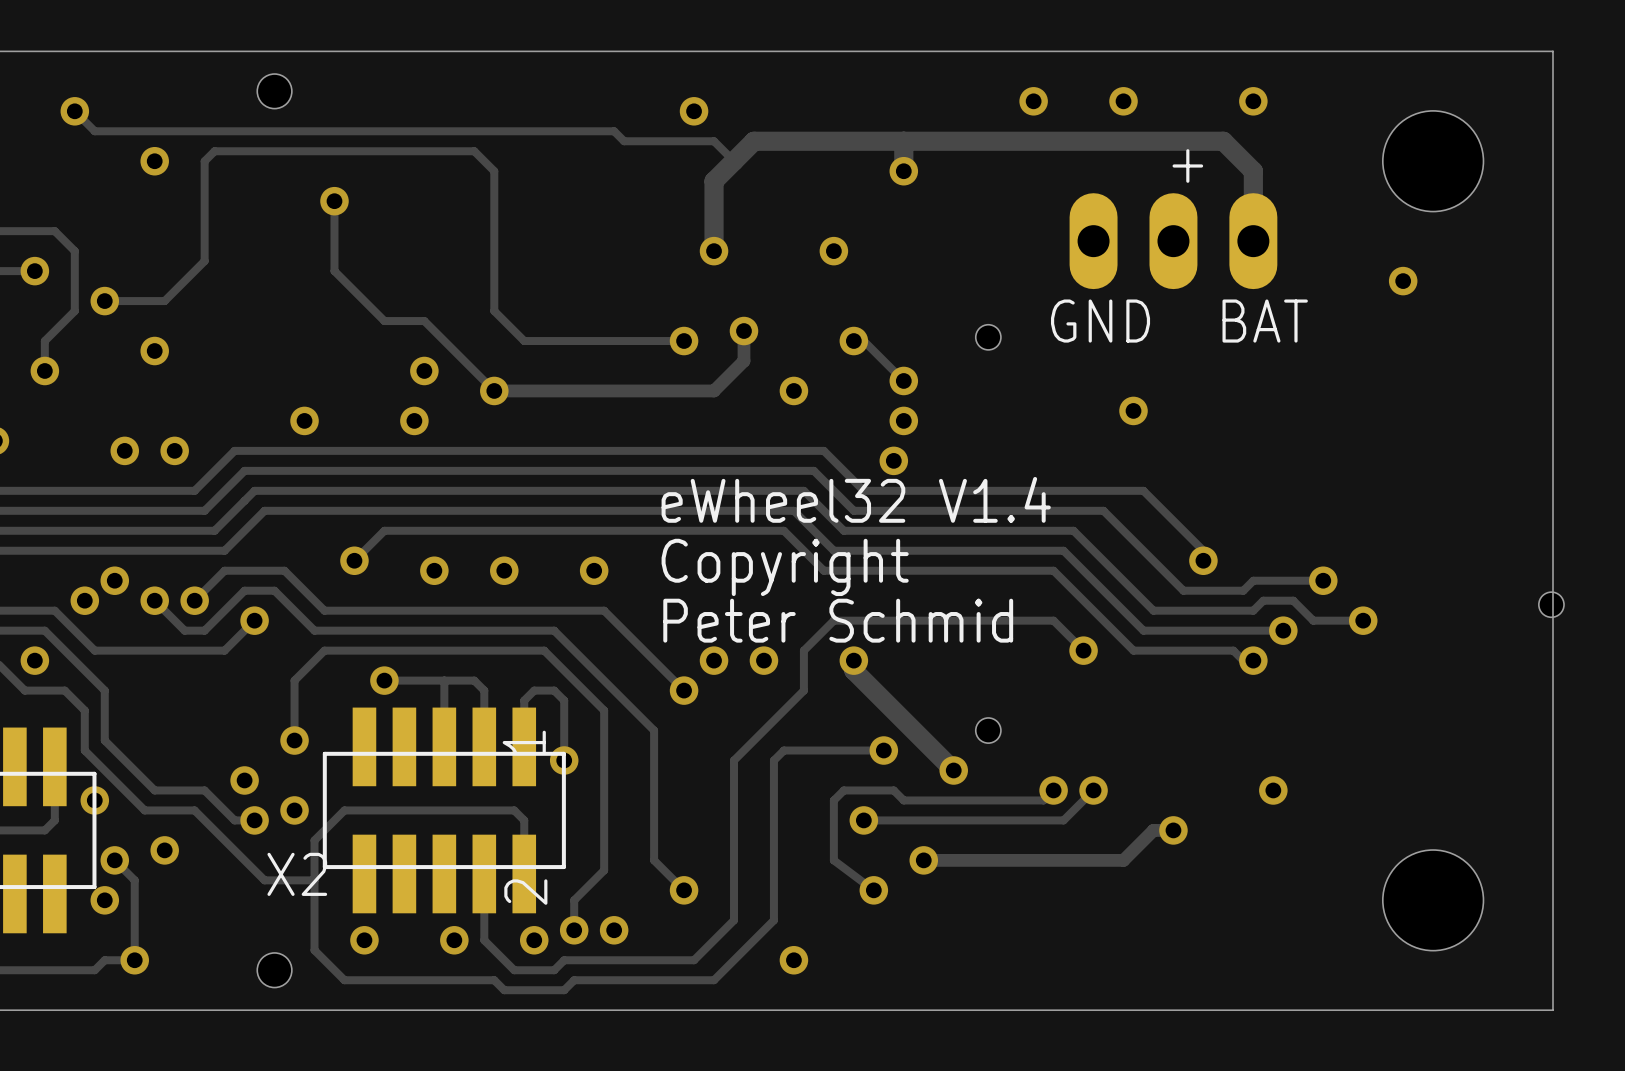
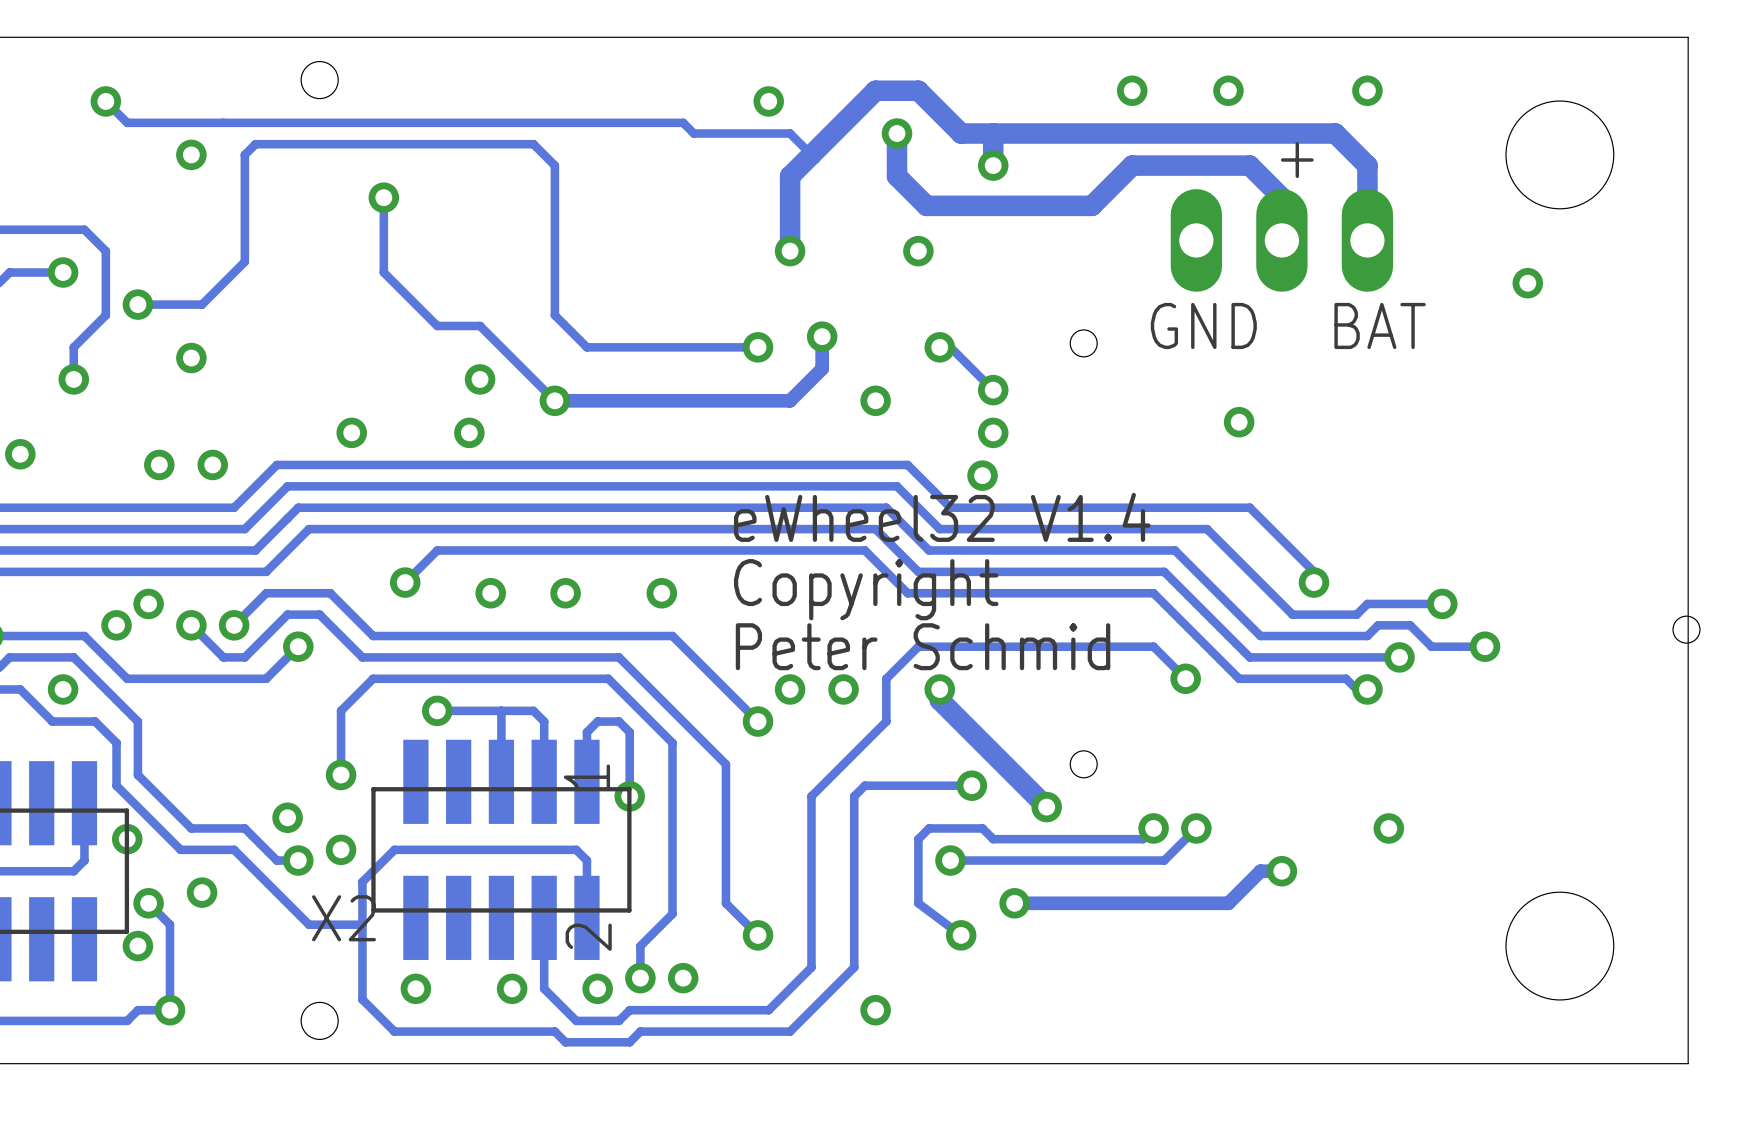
track: none -> (897, 133) (897, 176) (926, 205) (1091, 205) (1132, 165) (1249, 165) (1281, 197) (1281, 240)
via: none -> (897, 133)
track: (873, 141) (753, 141) -> (961, 133) (918, 90) (875, 90) (832, 133)

